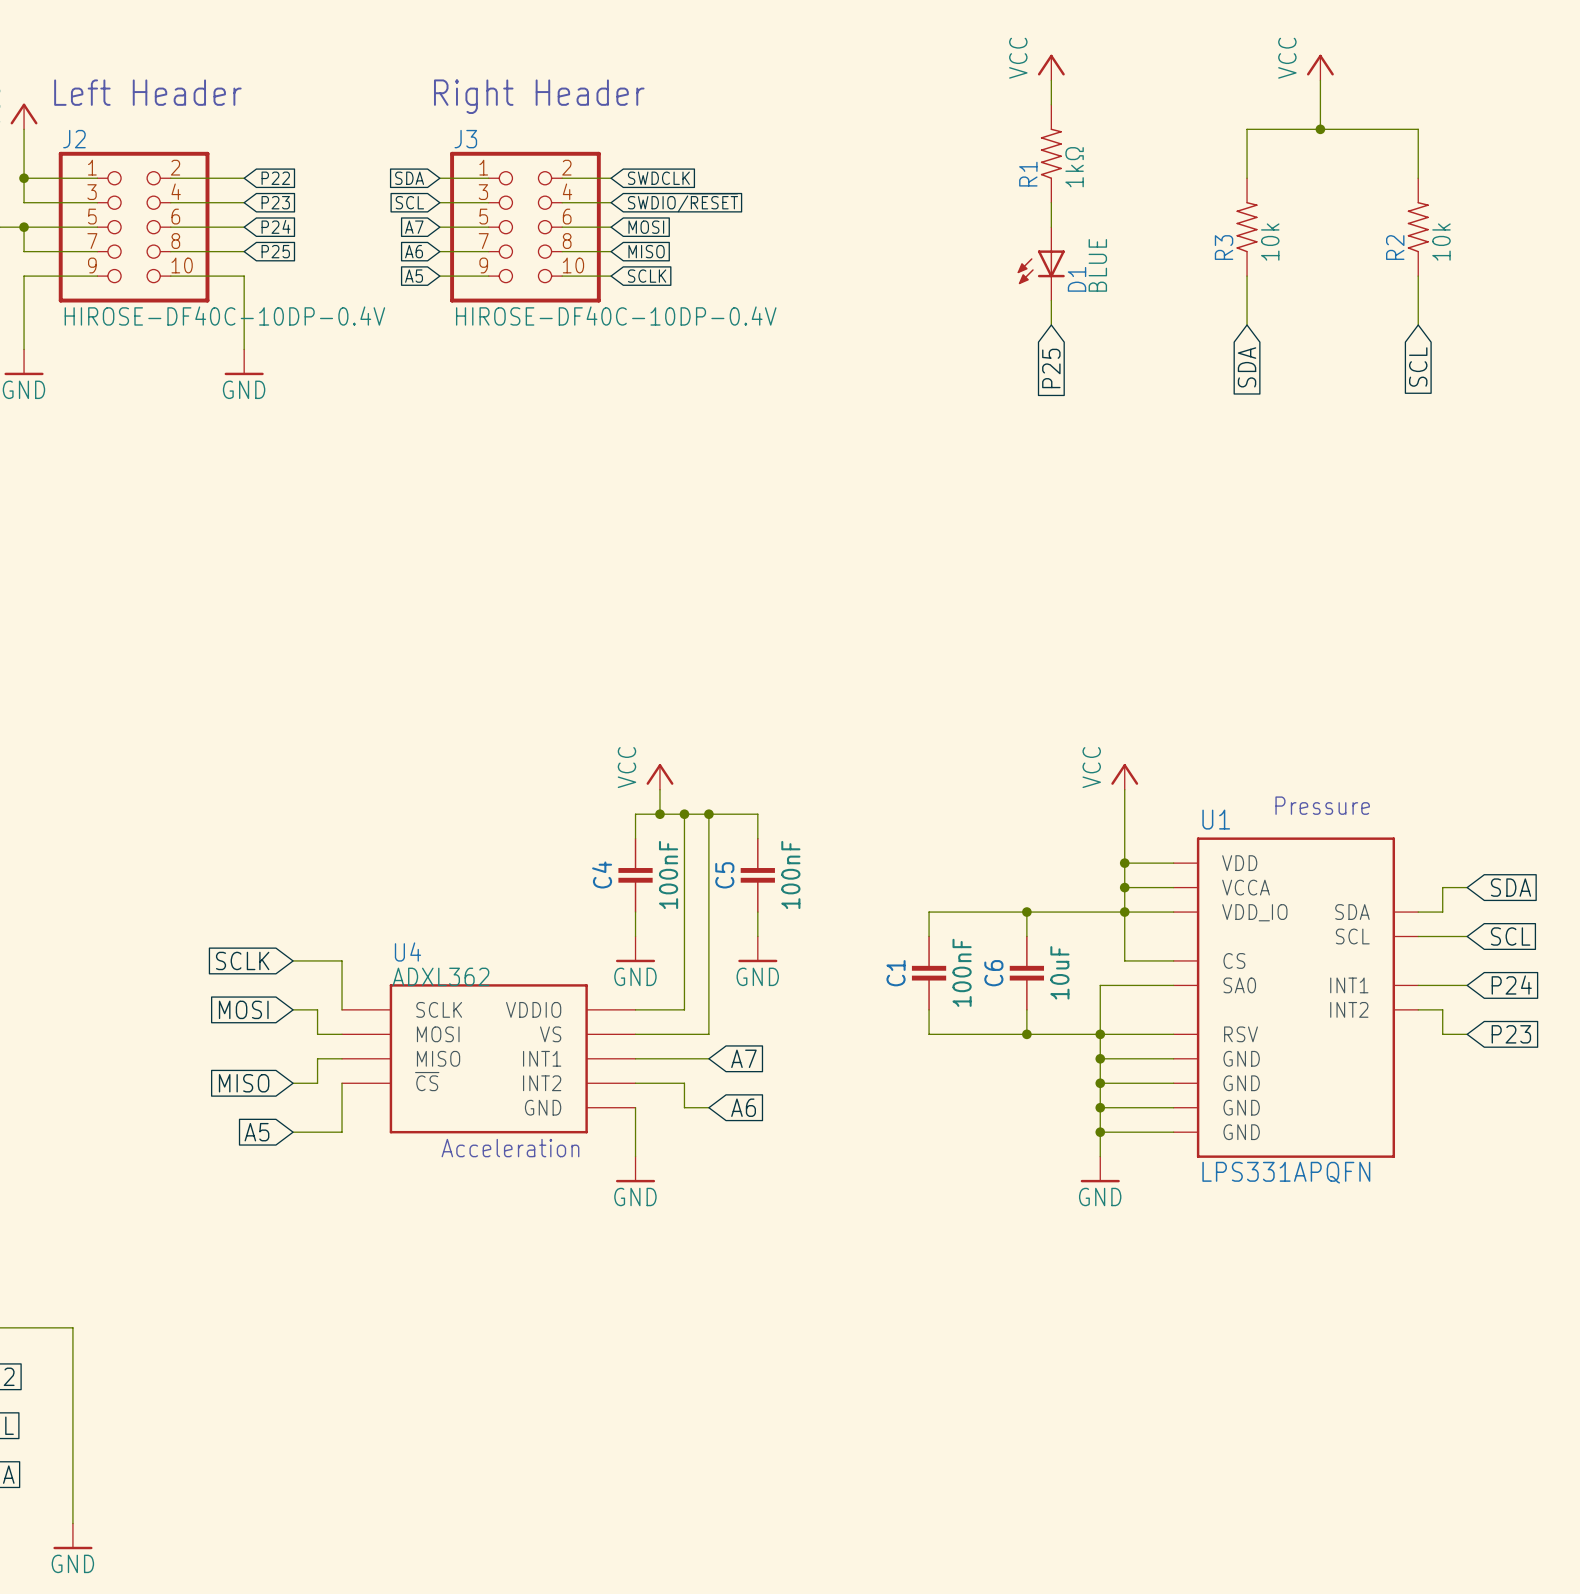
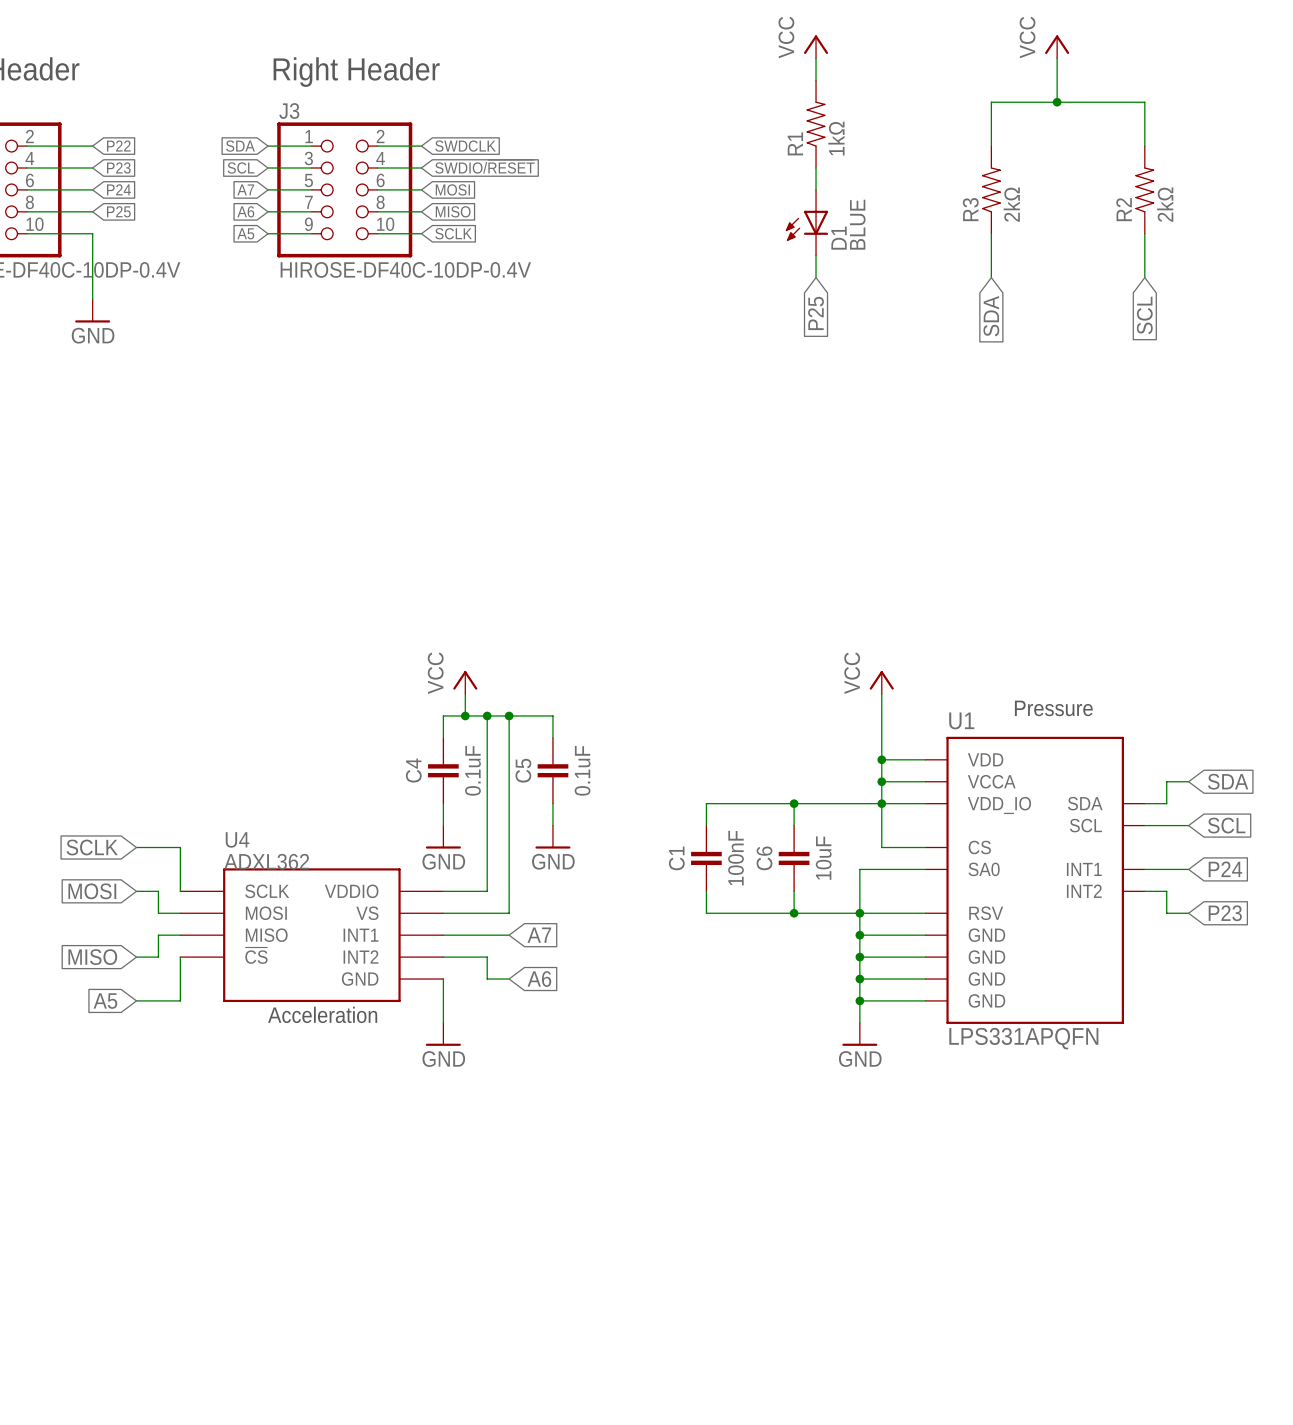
R3 value: 10k (1270, 242) -> 2kΩ (1011, 204)
R2 value: 10k (1441, 242) -> 2kΩ (1165, 204)
C4 value: 100nF (668, 874) -> 0.1uF (472, 770)
C5 value: 100nF (790, 874) -> 0.1uF (582, 770)

